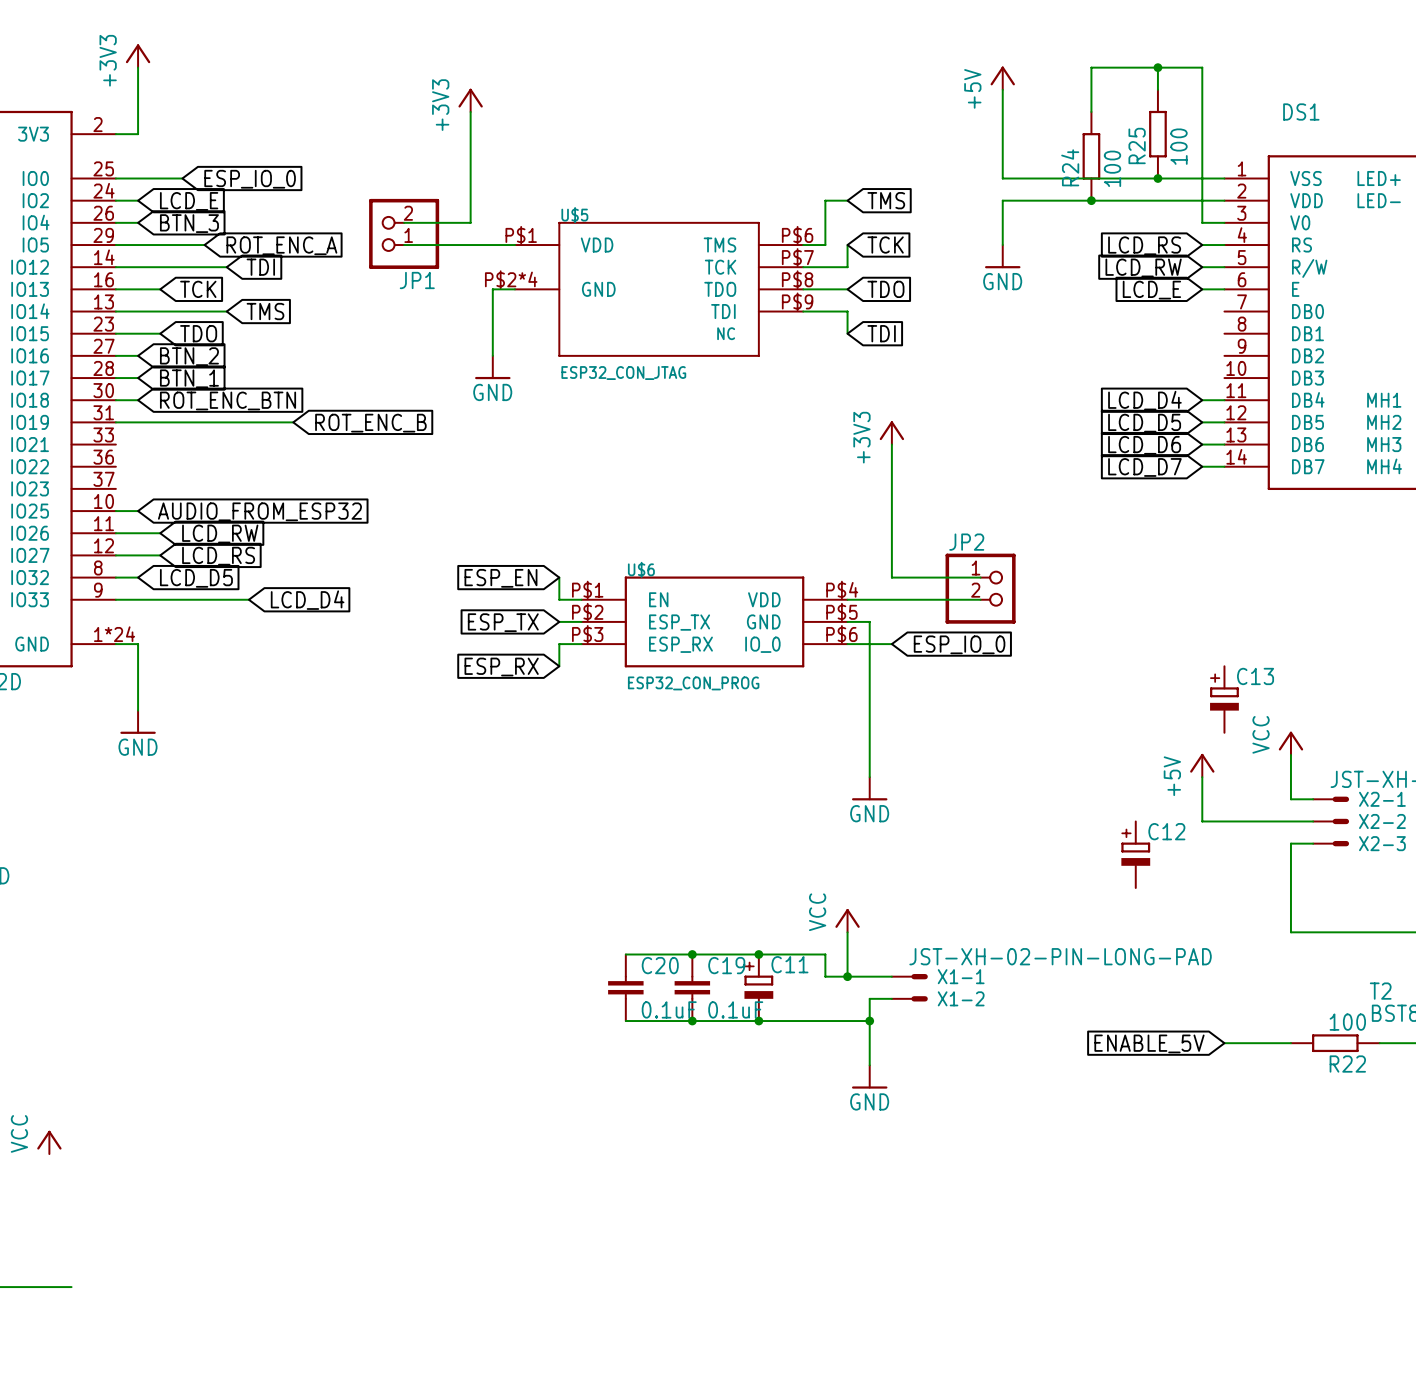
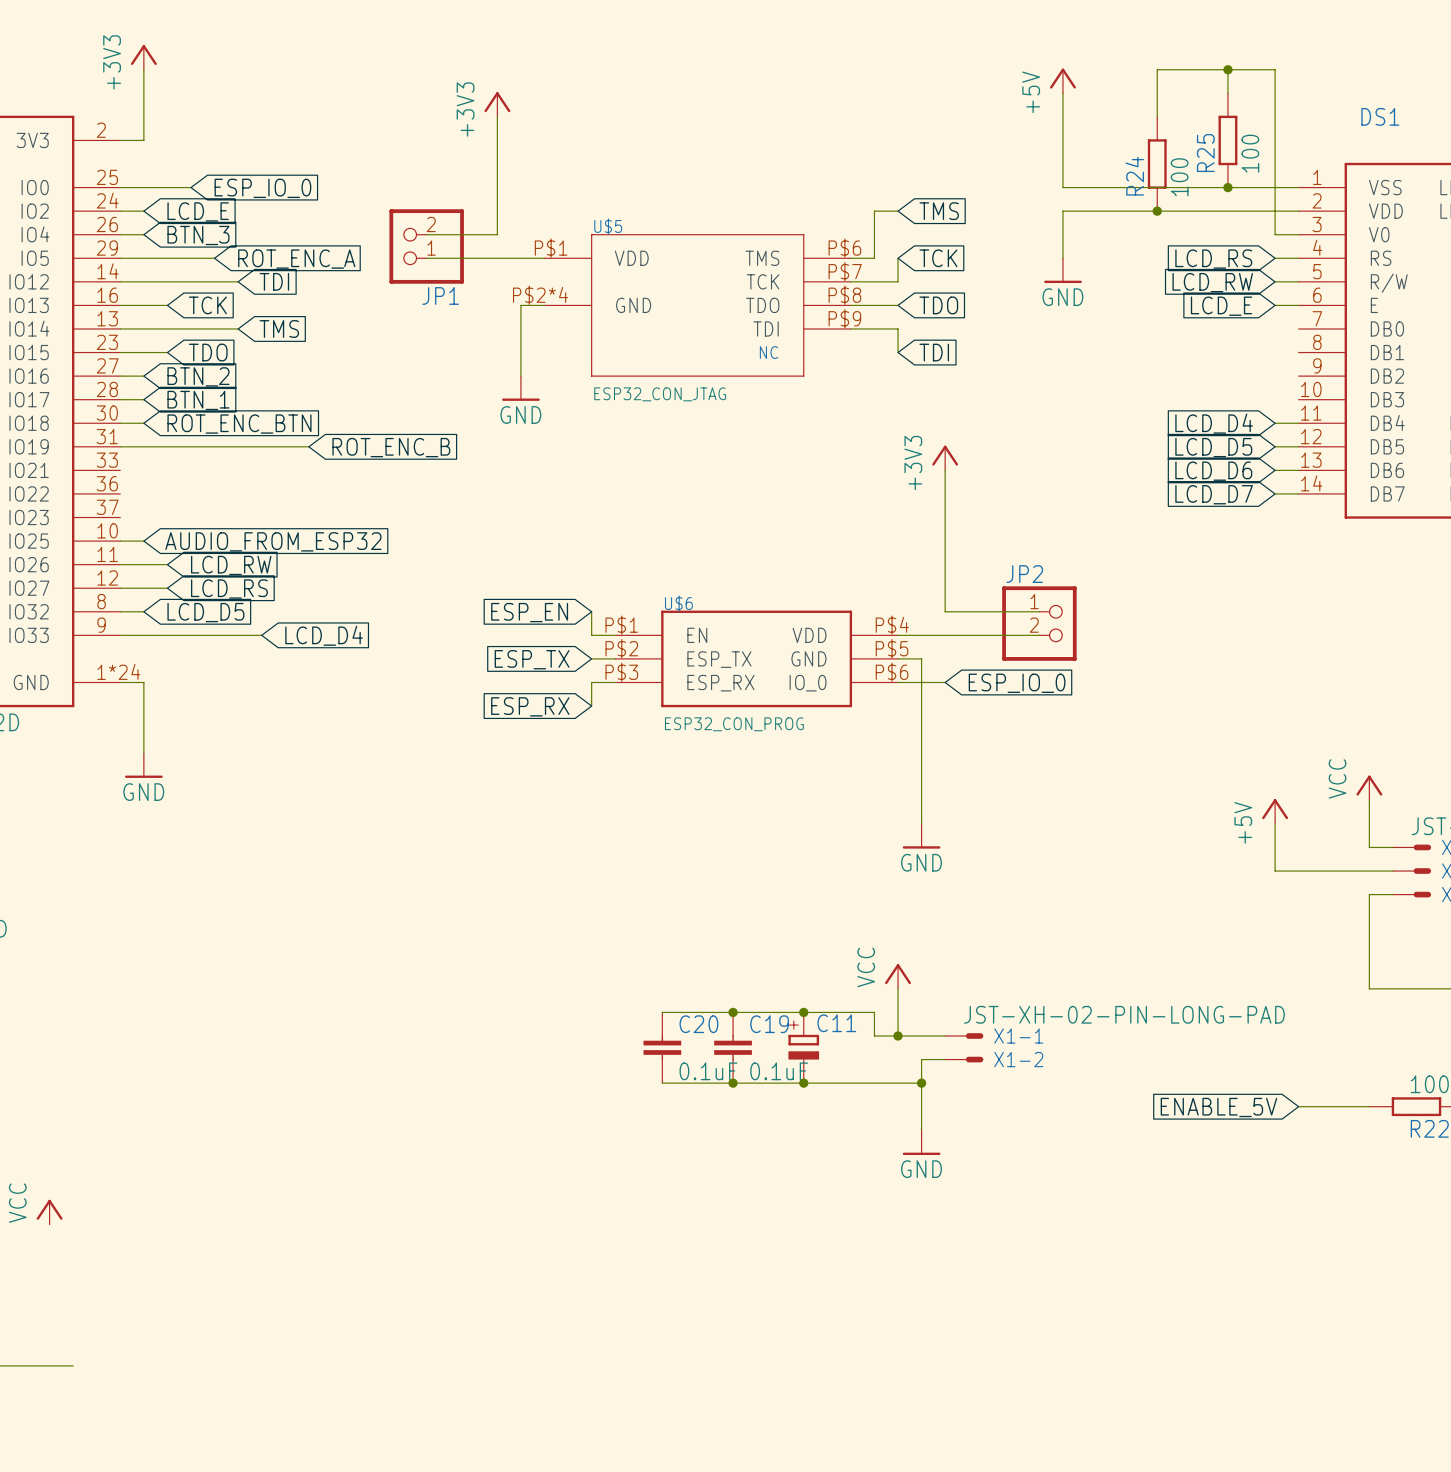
C13: (1224, 699) -> none
C12: (1135, 854) -> none

